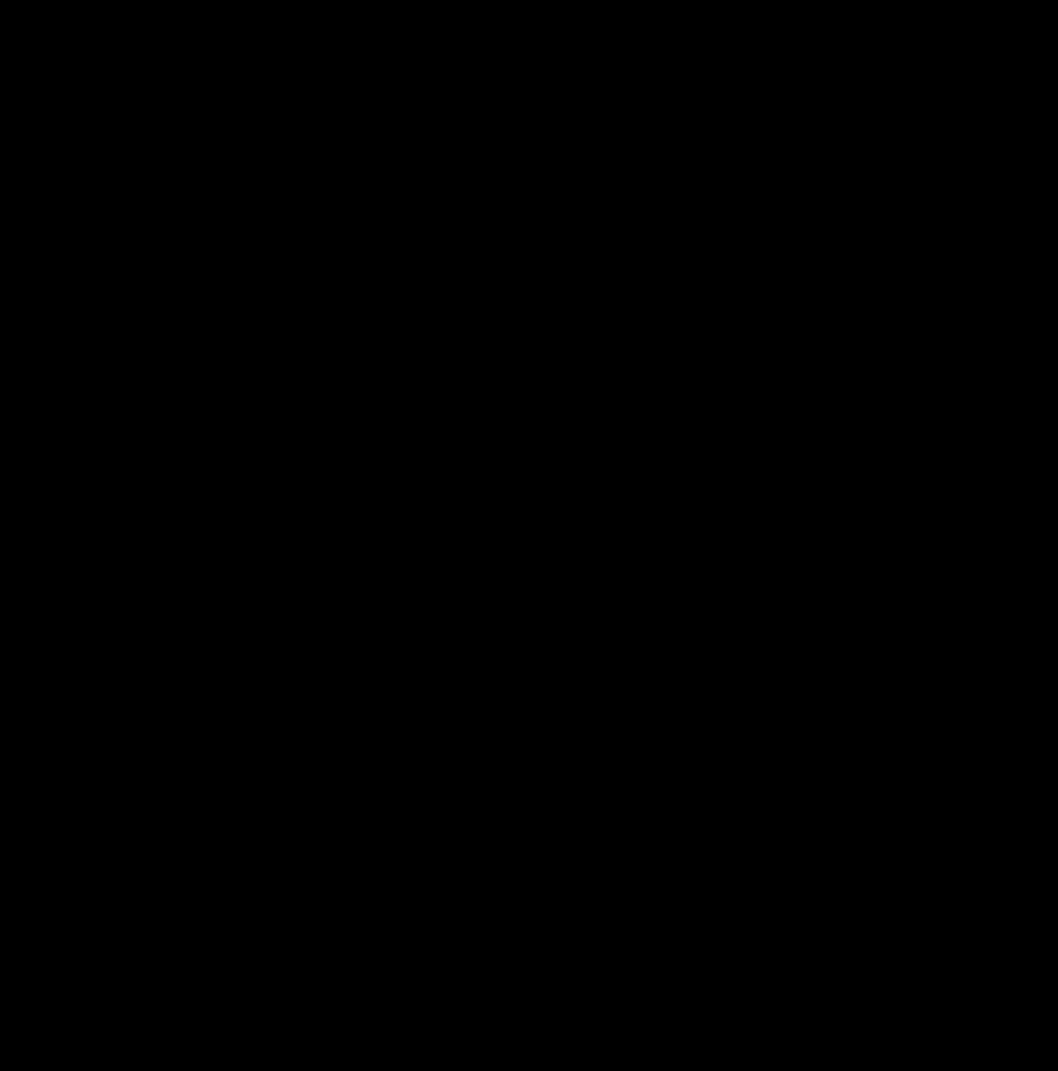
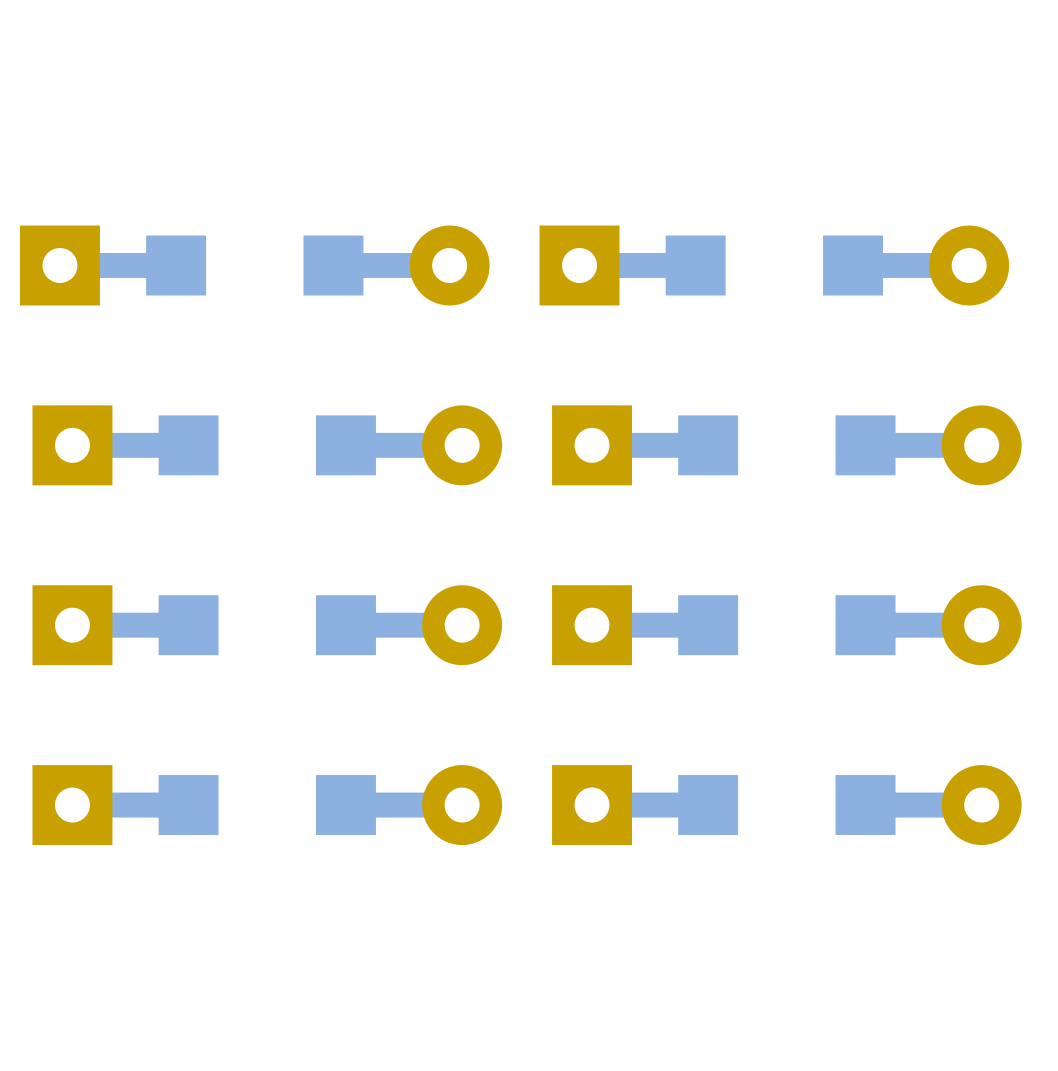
part: none -> (254, 265)
part: none -> (774, 265)
part: none -> (267, 445)
part: none -> (786, 445)
part: none -> (267, 625)
part: none -> (786, 625)
part: none -> (267, 805)
part: none -> (786, 805)

